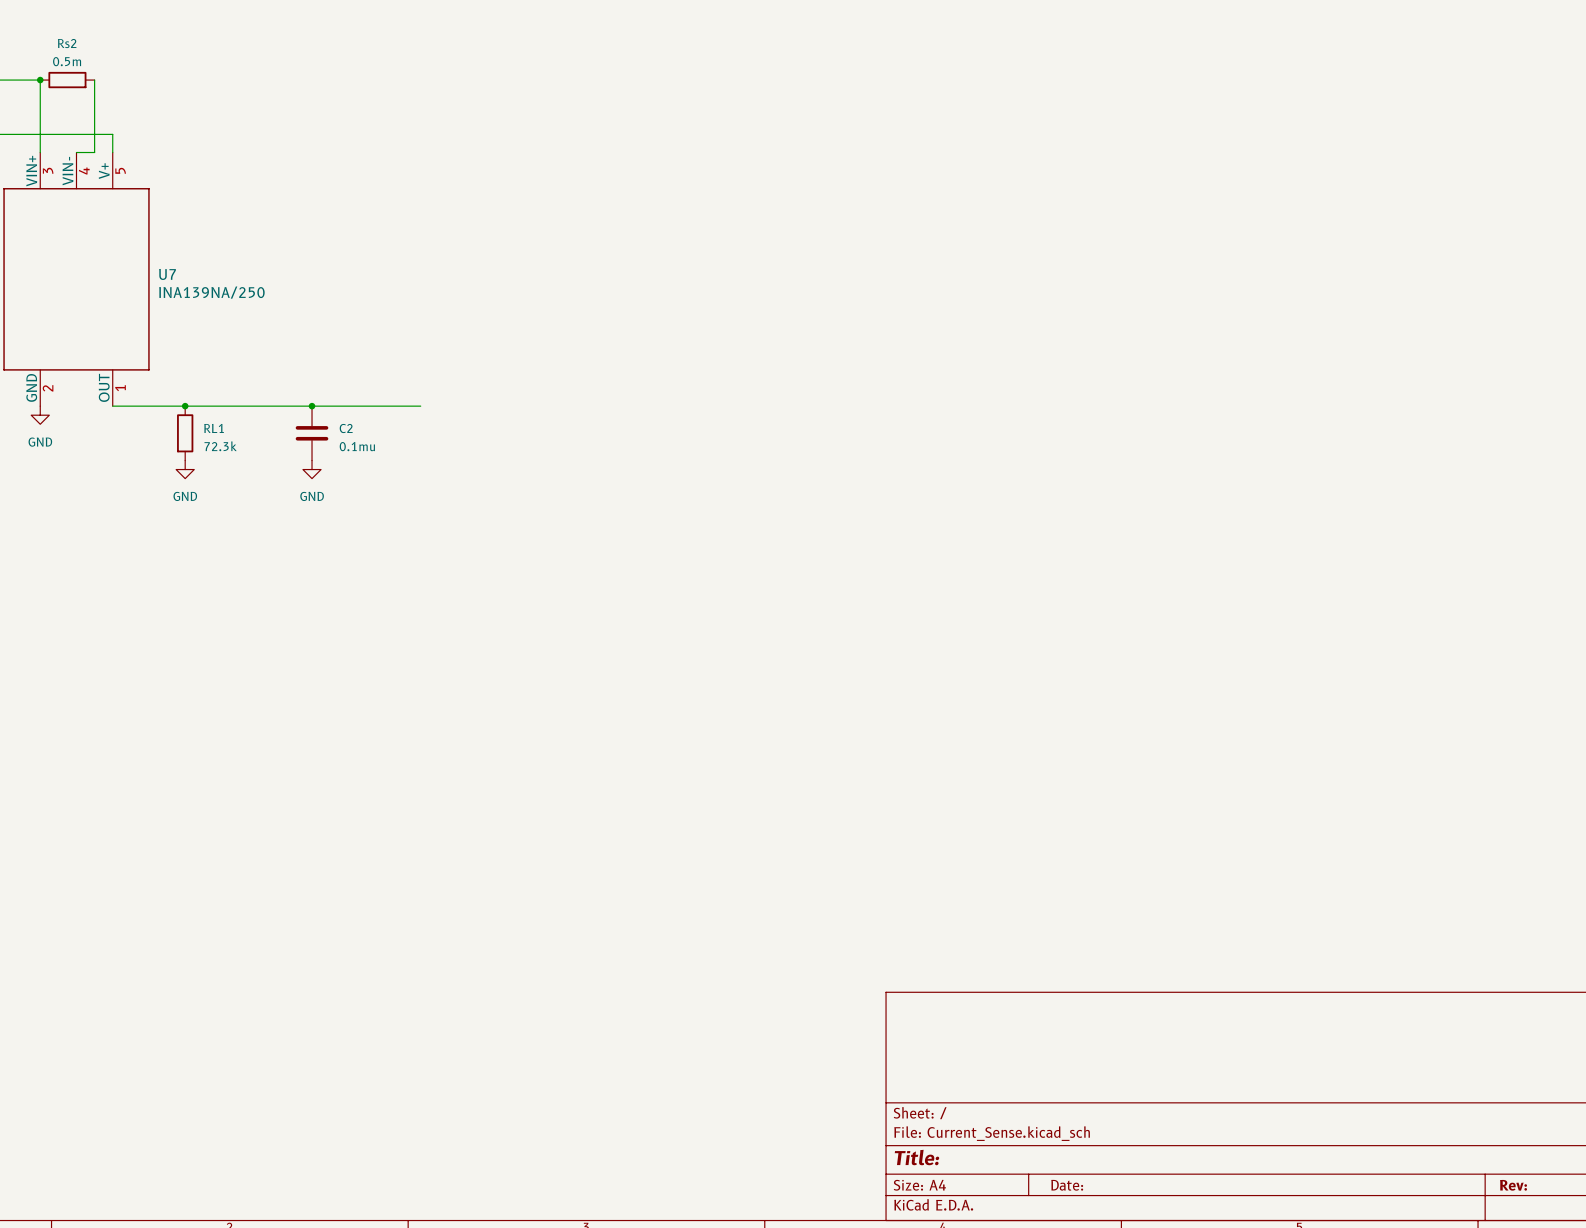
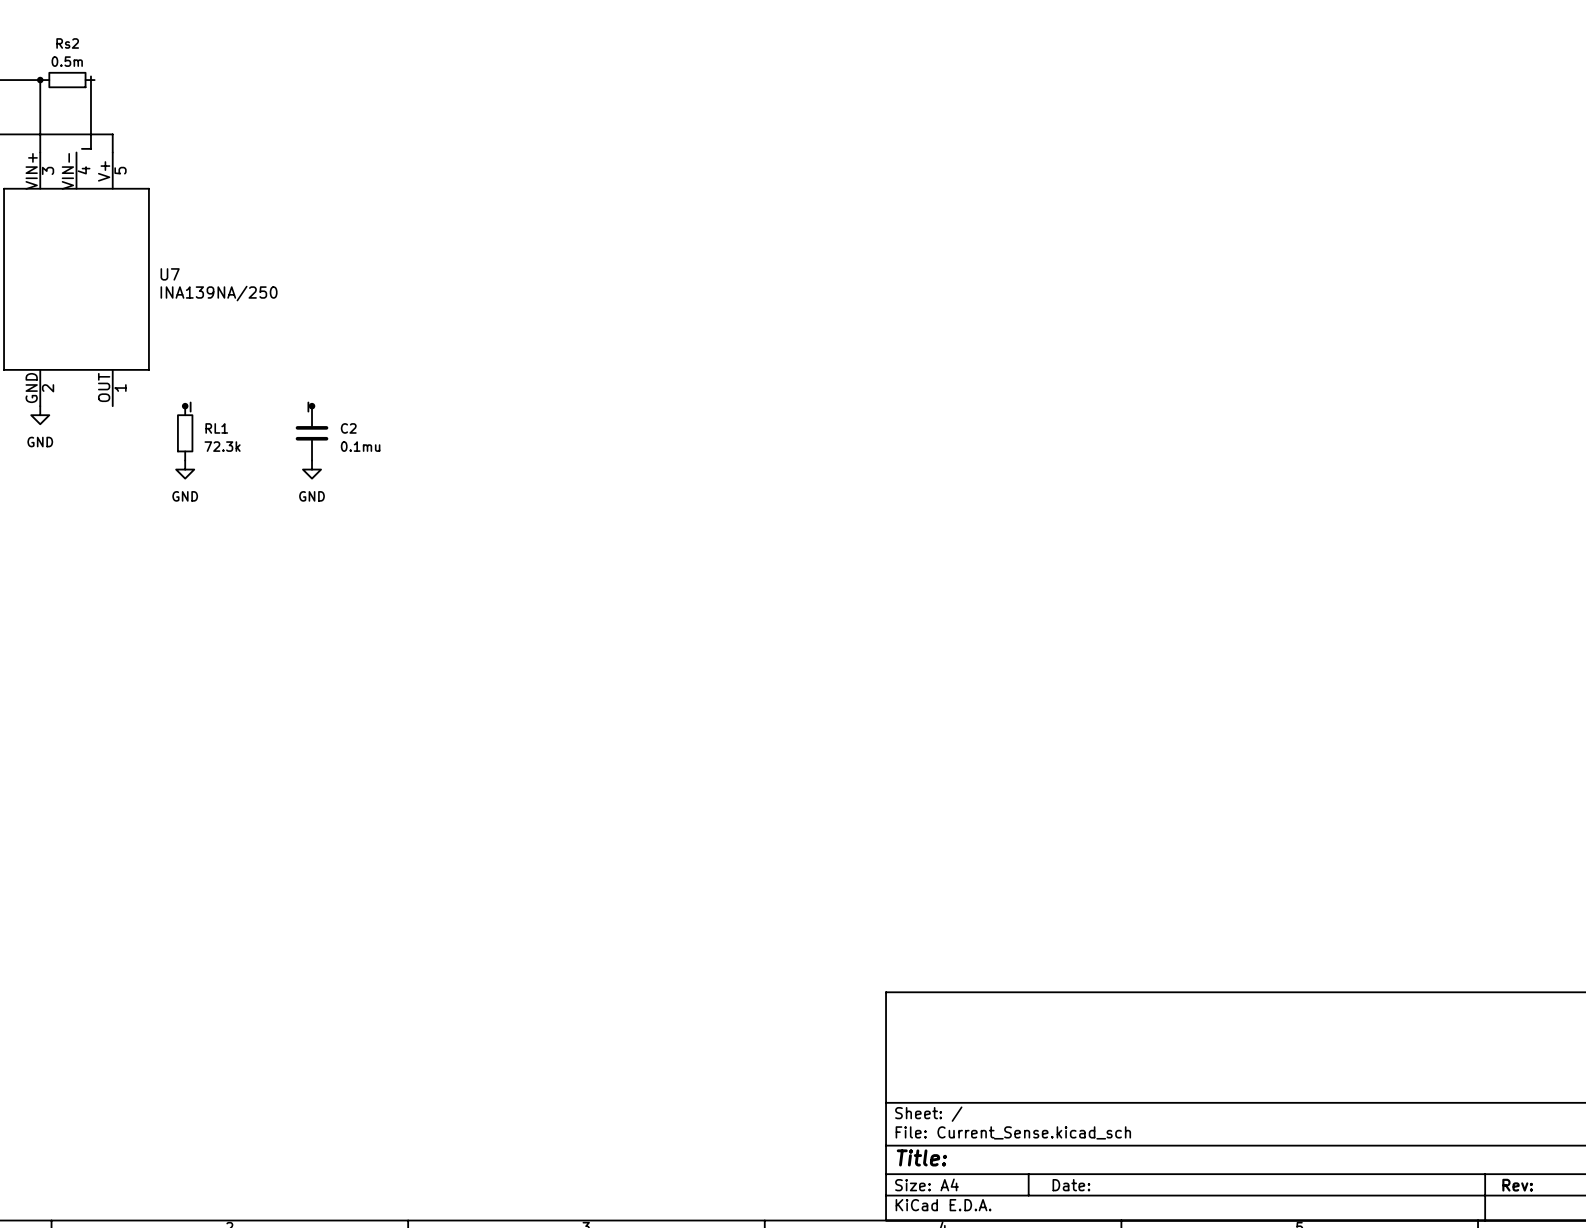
wire: none -> (90, 76) (90, 148) (81, 148)
wire: (94, 80) (94, 152) (76, 152) -> none
wire: none -> (190, 402) (190, 411)
wire: none -> (308, 402) (308, 411)
wire: (112, 406) (420, 406) -> none

